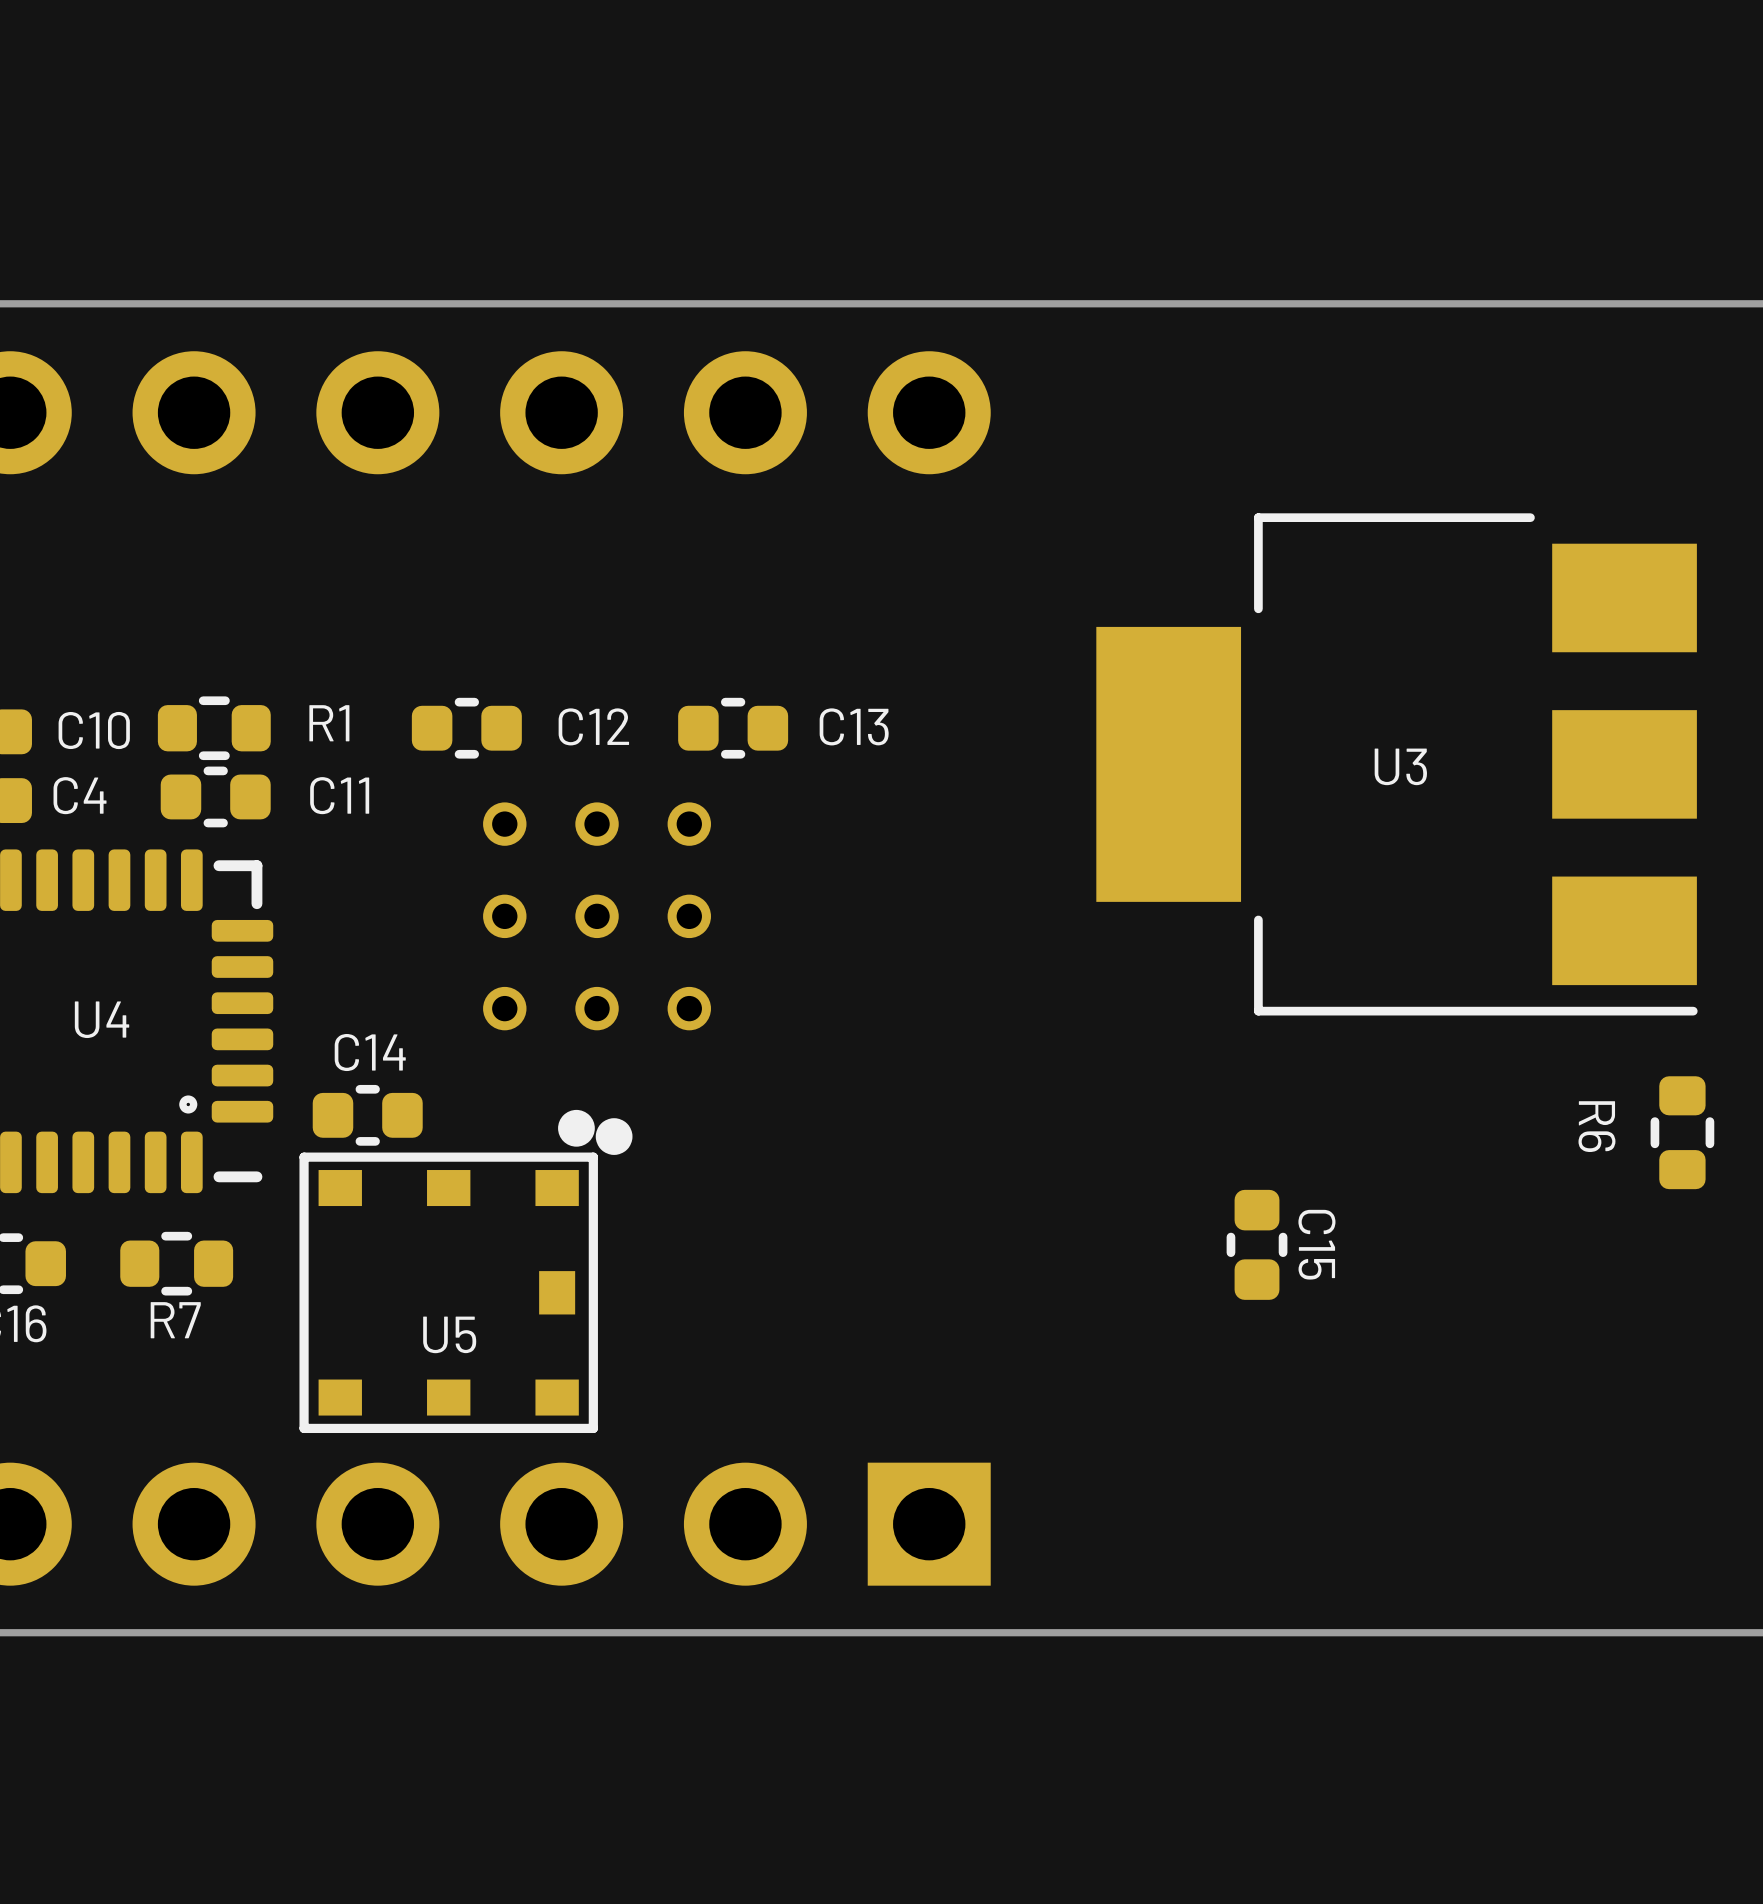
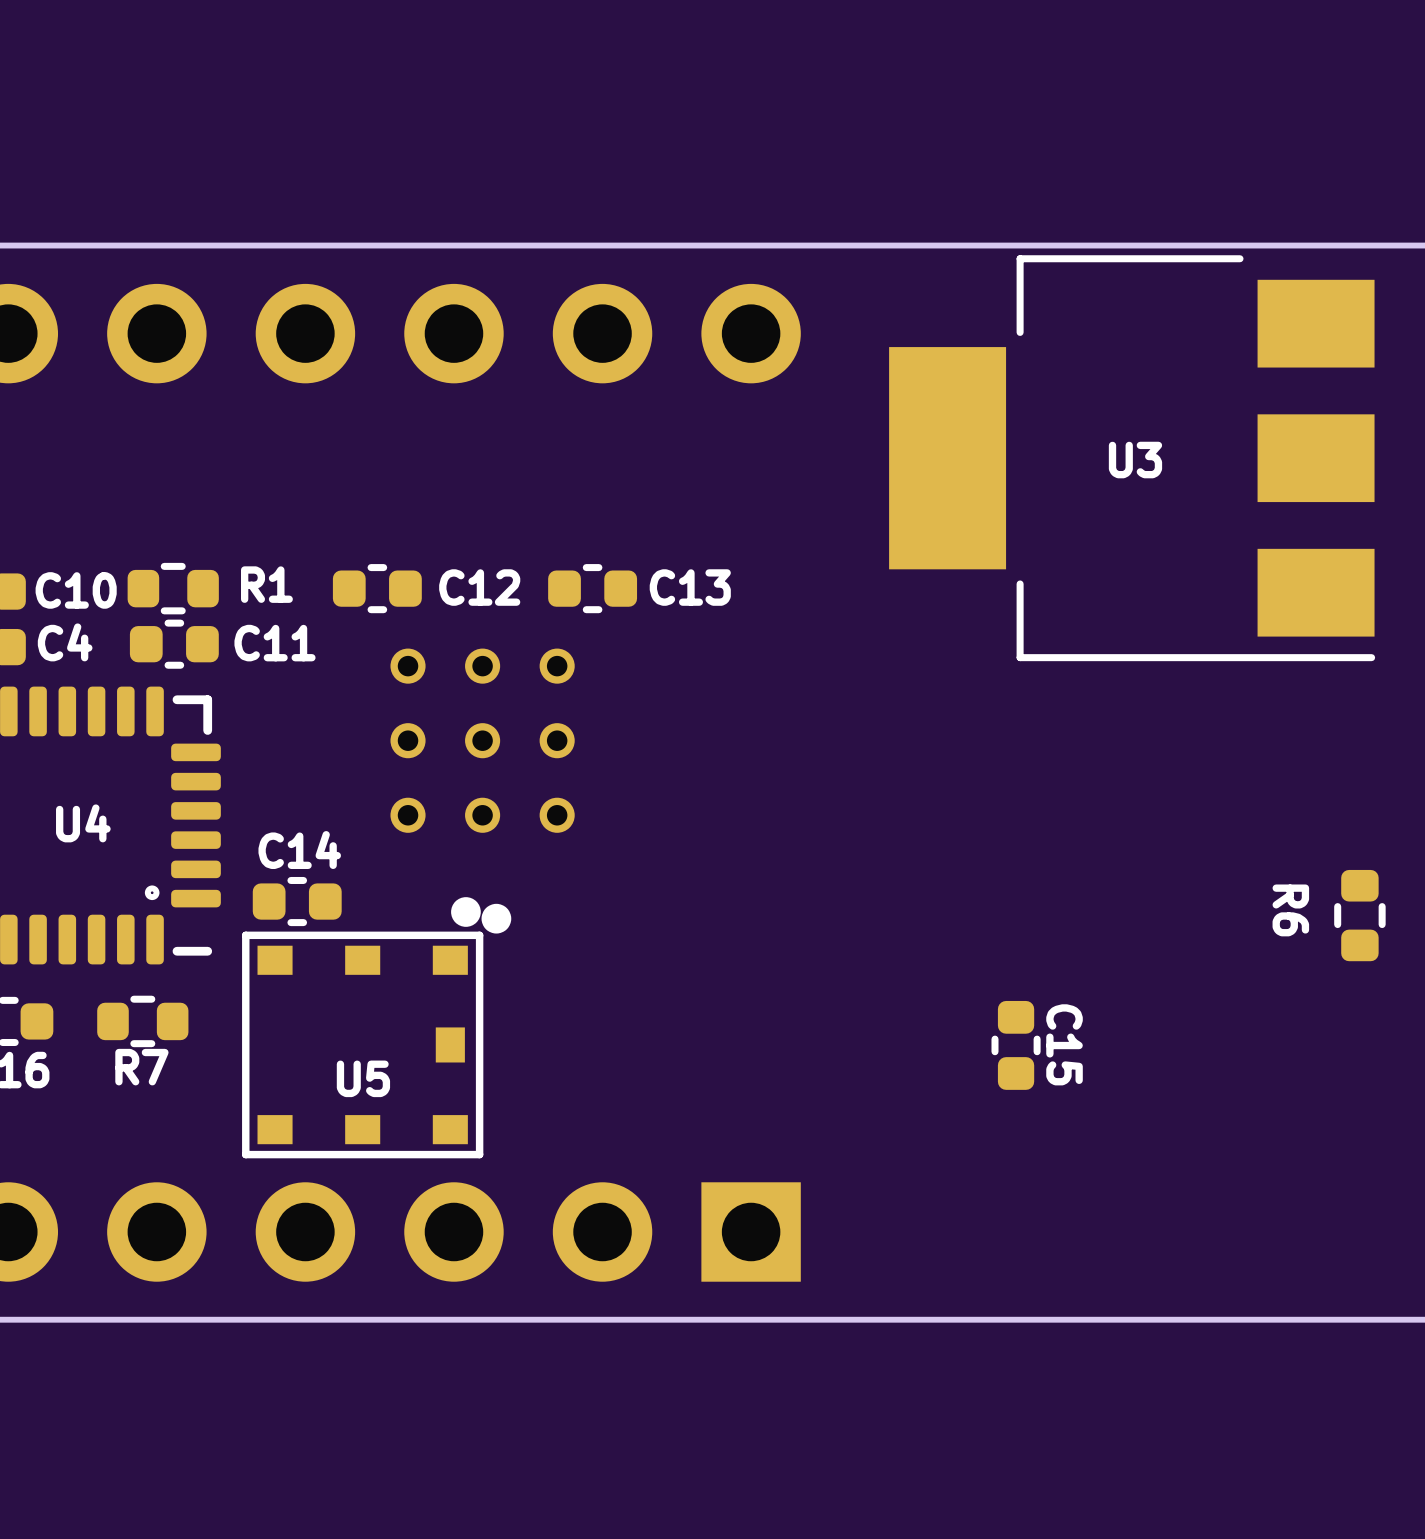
U3 position: (1396, 764) -> (1132, 458)
C15 position: (1257, 1244) -> (1016, 1045)

